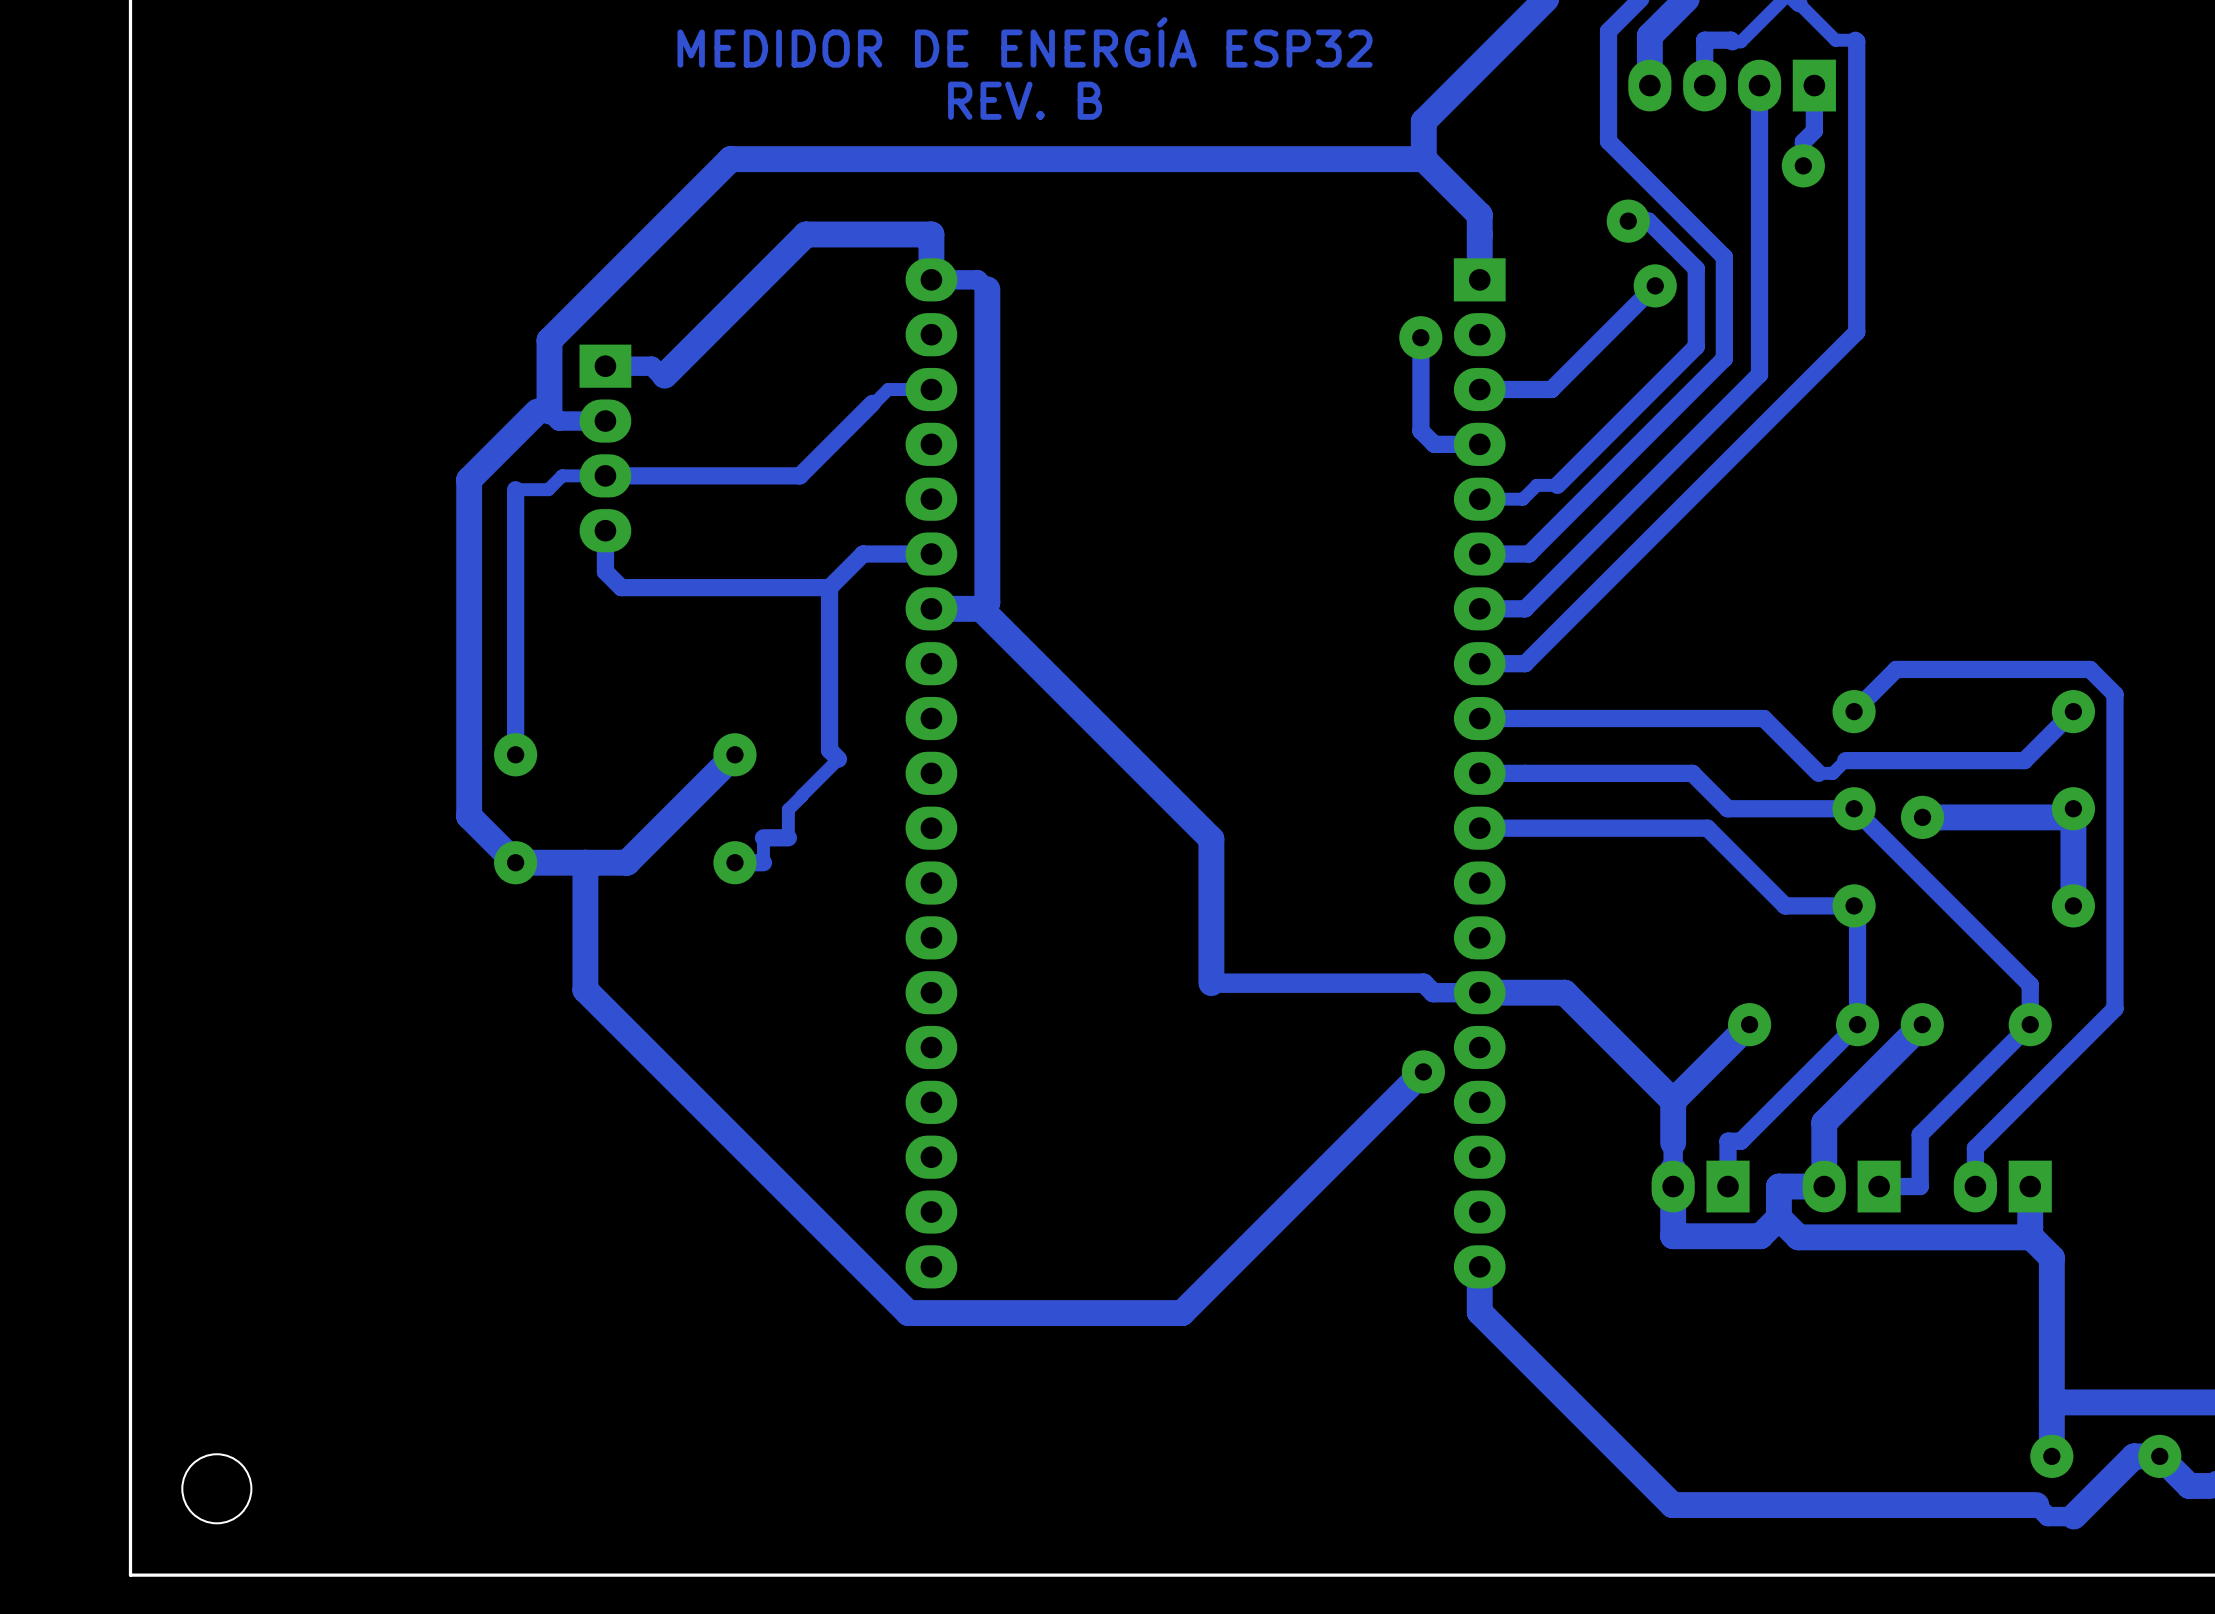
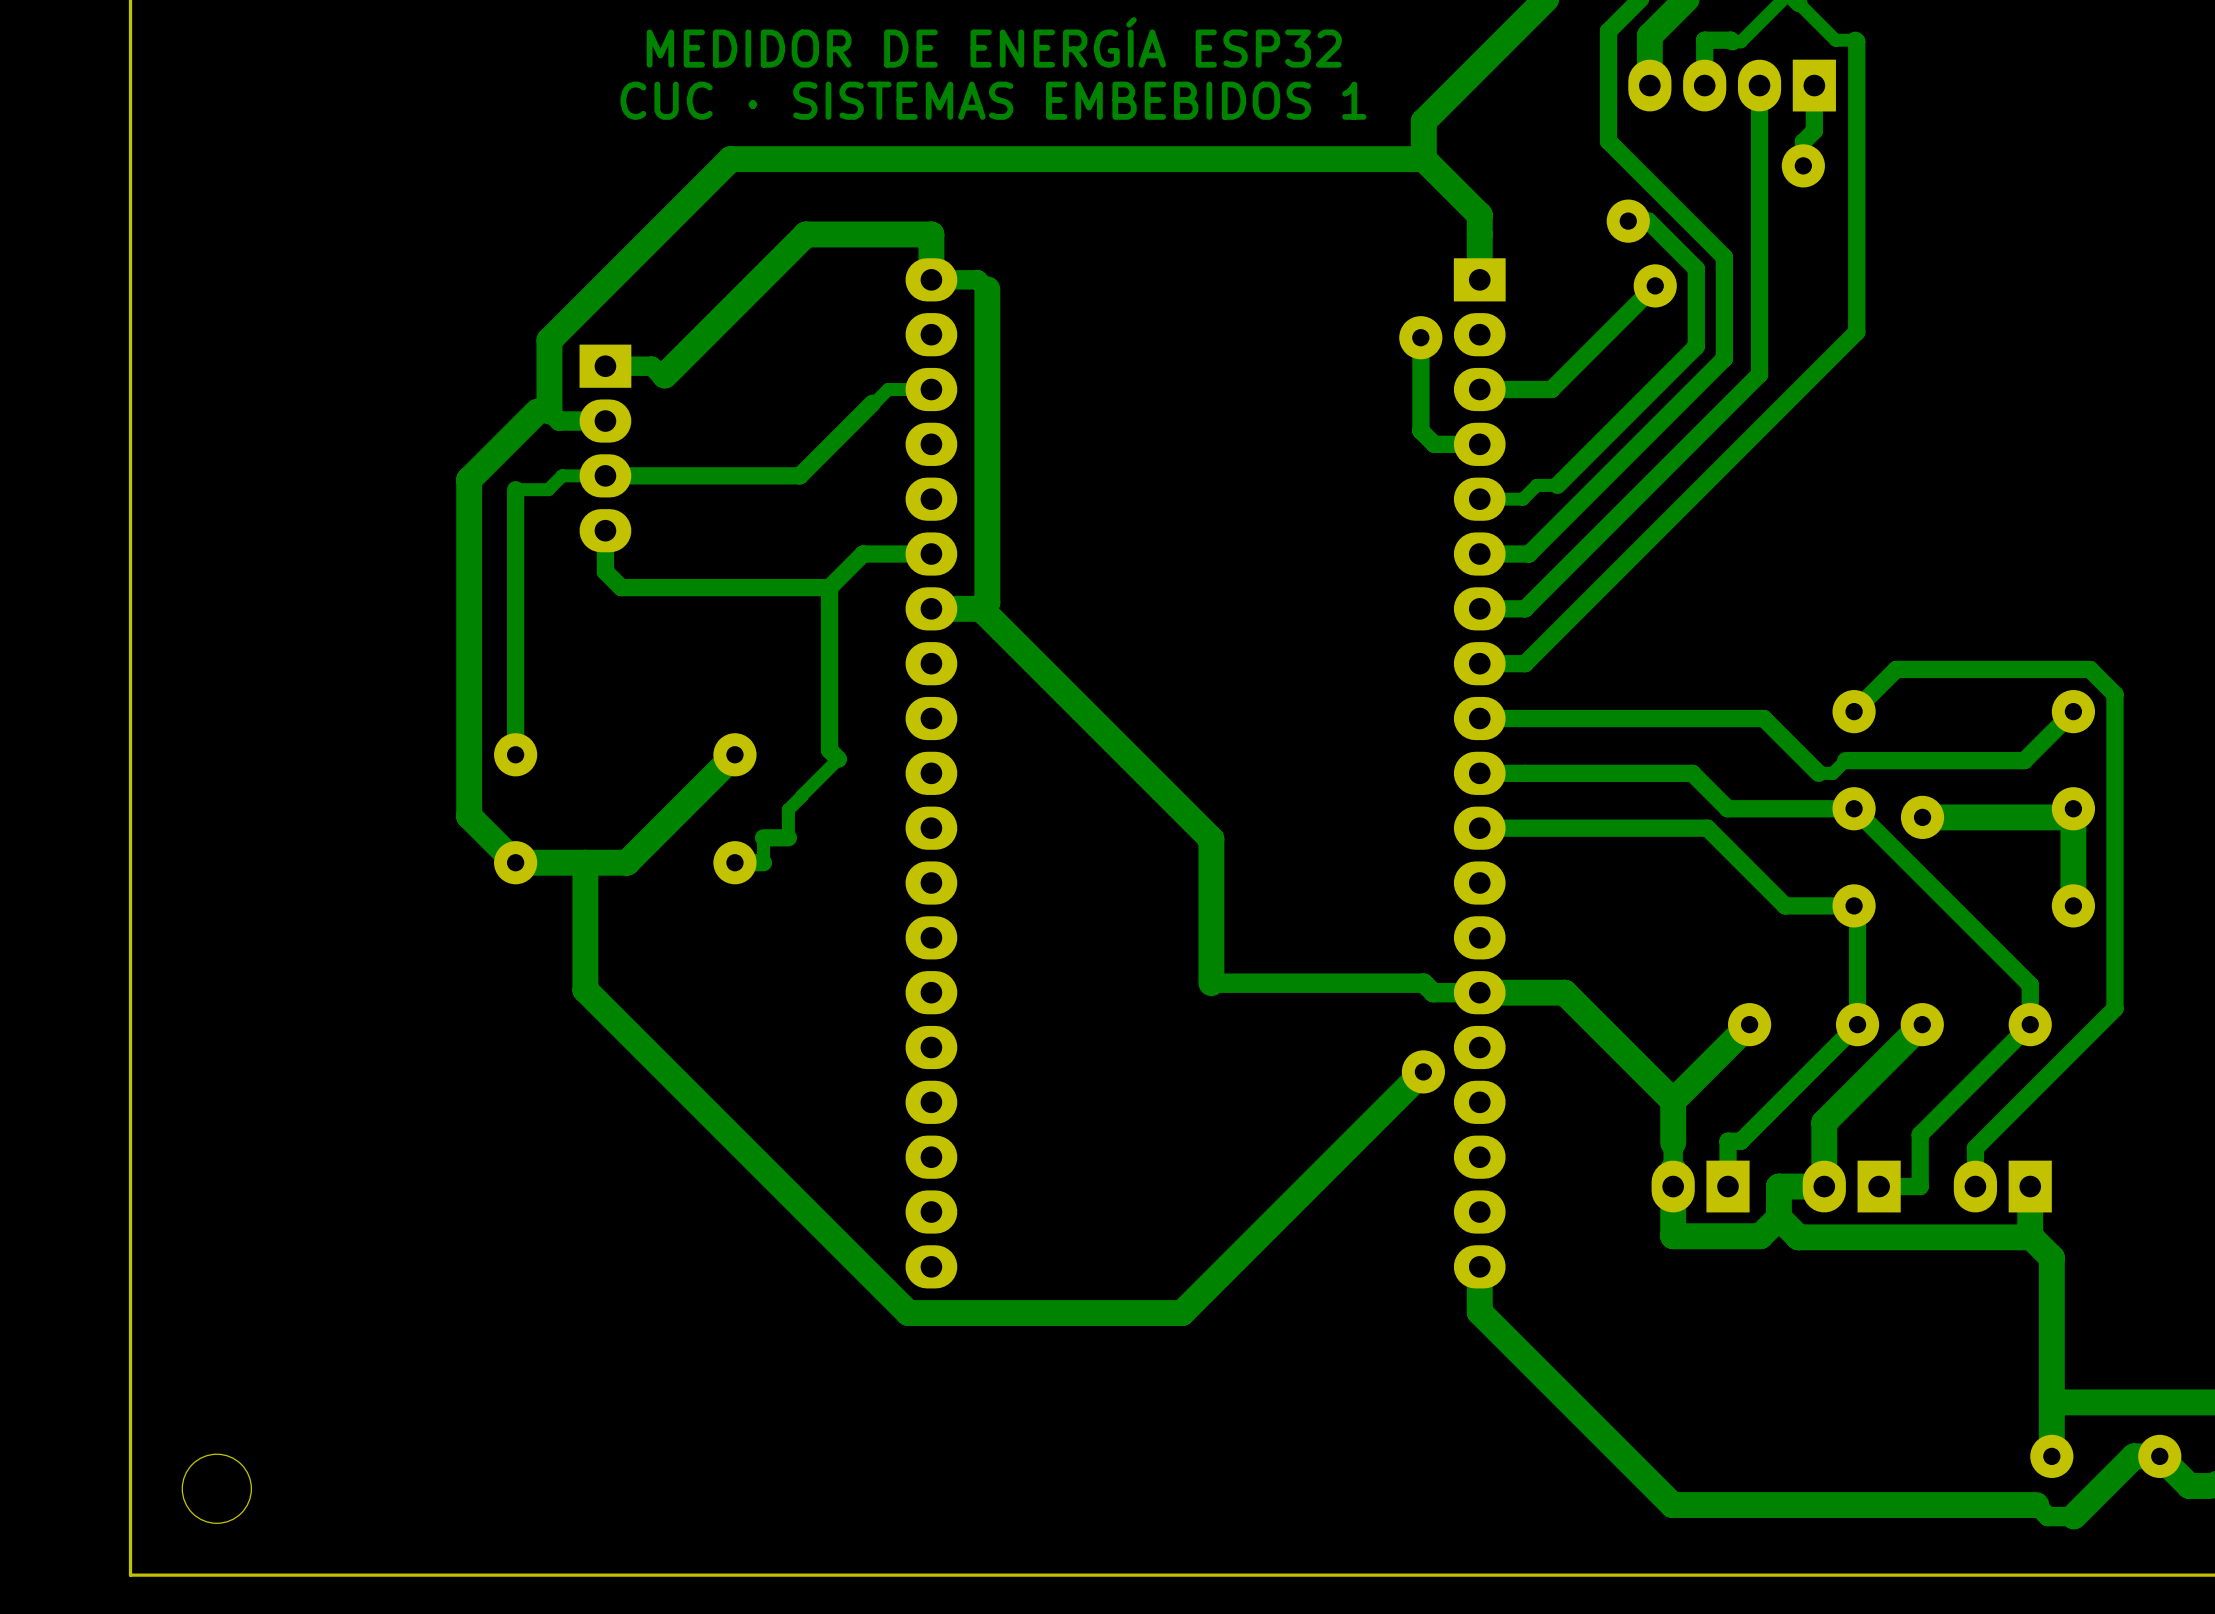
text position: MEDIDOR DE ENERGÍA ESP32 (1025, 42) -> MEDIDOR DE ENERGÍA ESP32 (994, 42)
text: none -> CUC · SISTEMAS EMBEBIDOS 1 (993, 100)
text: REV. B (1025, 100) -> none

